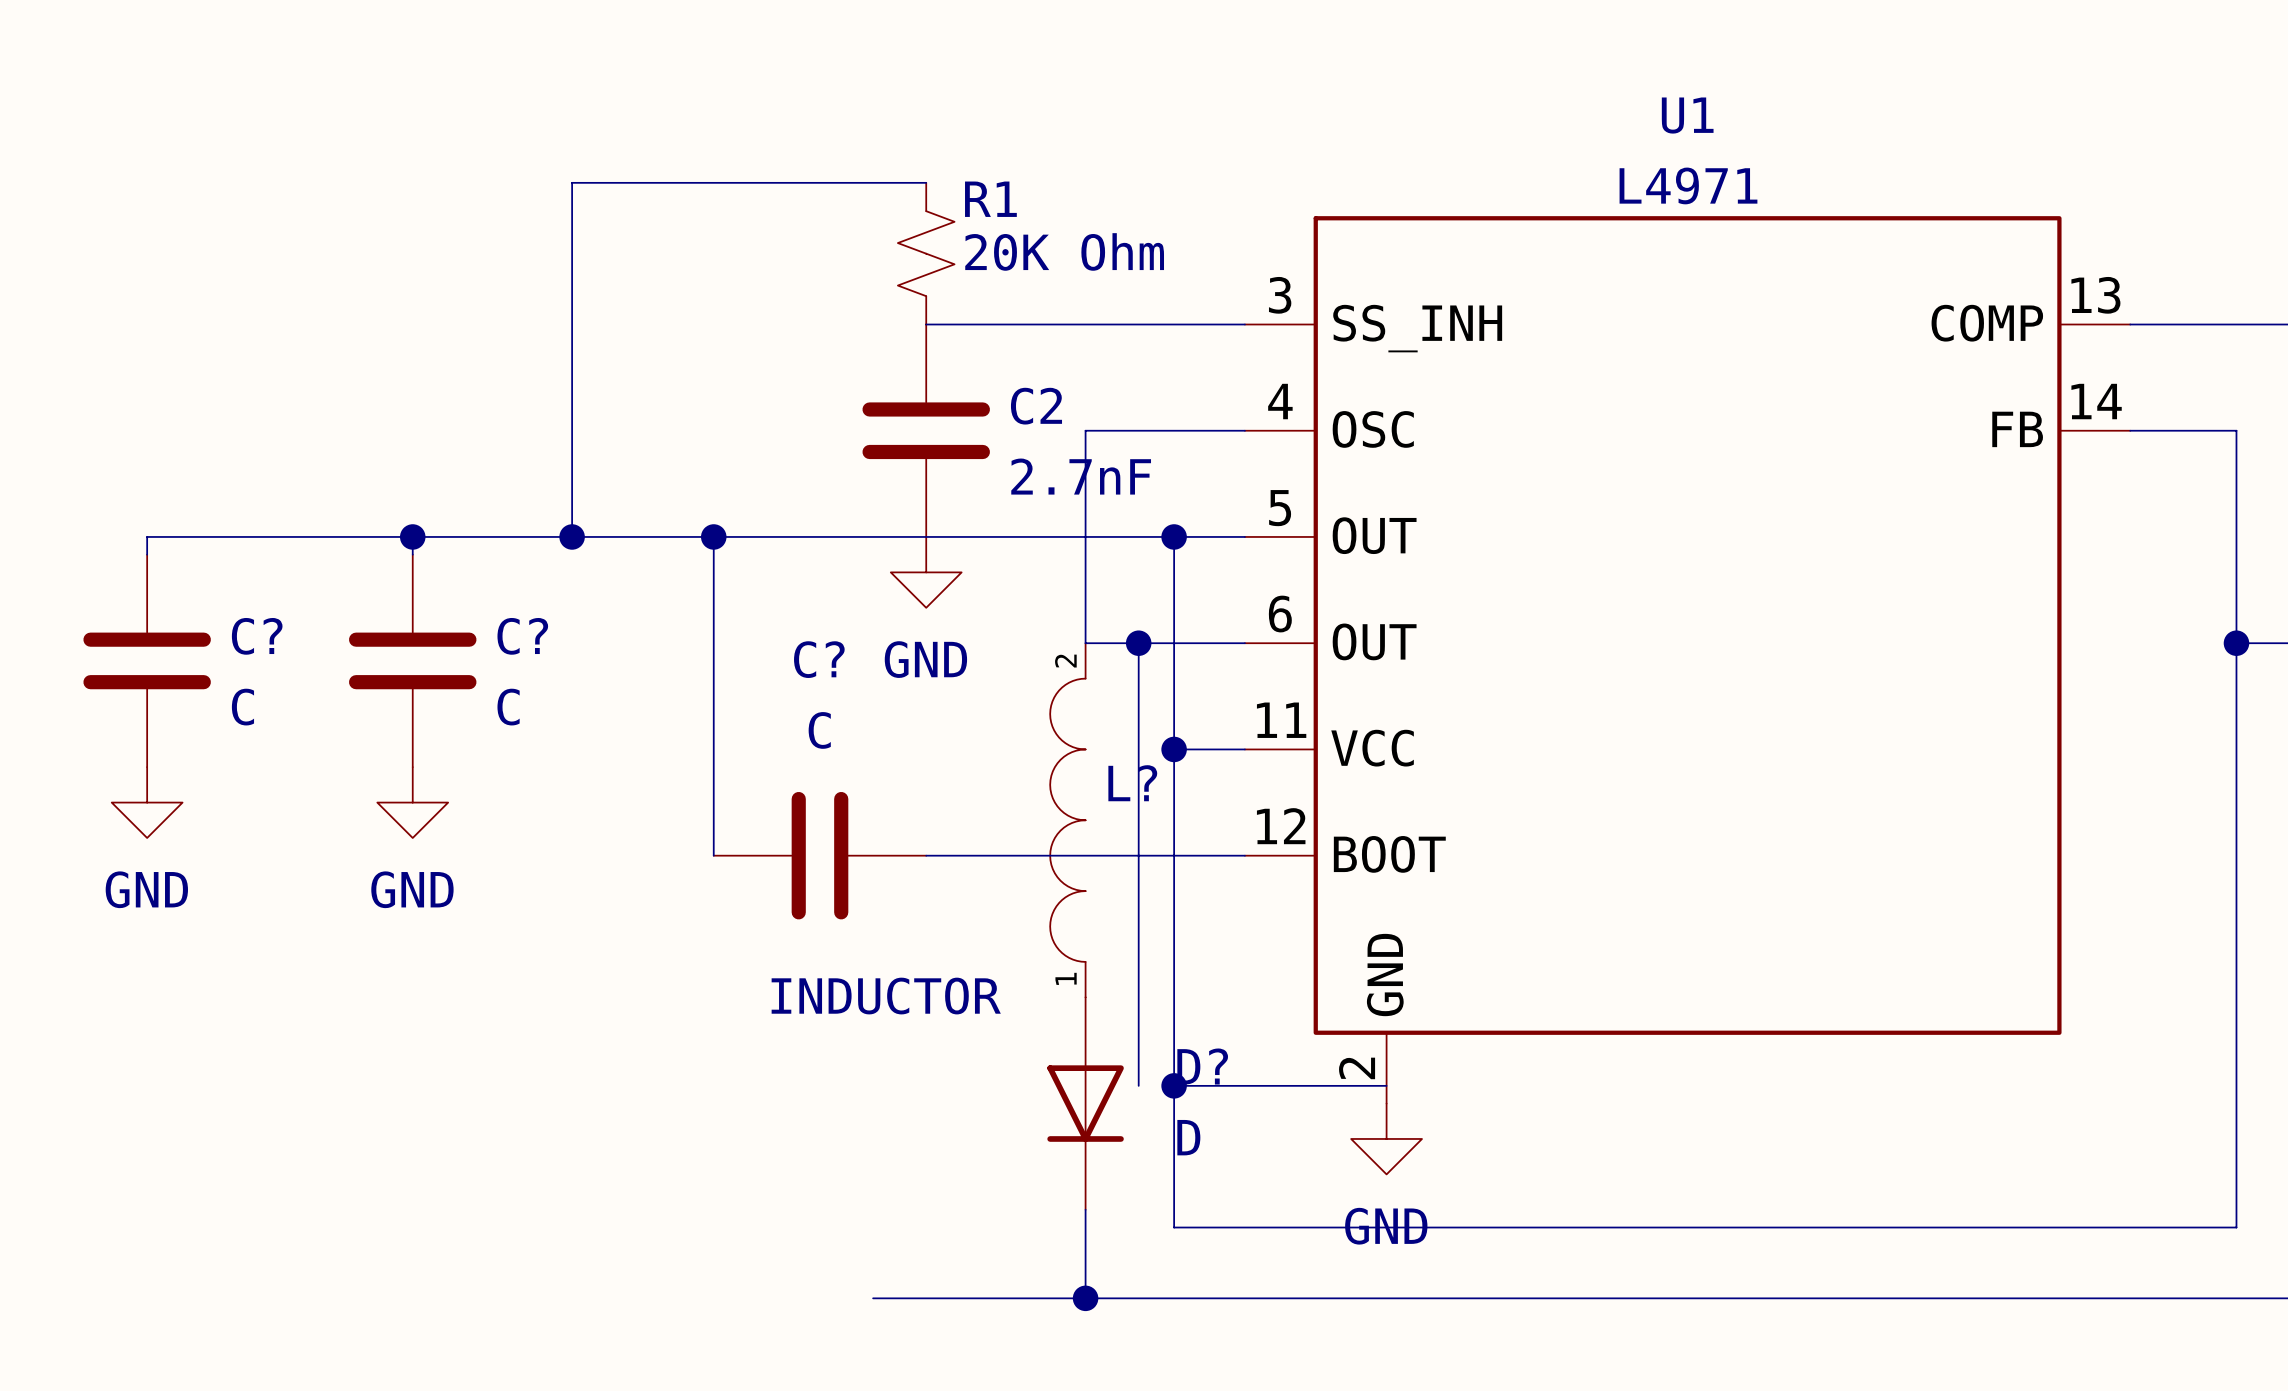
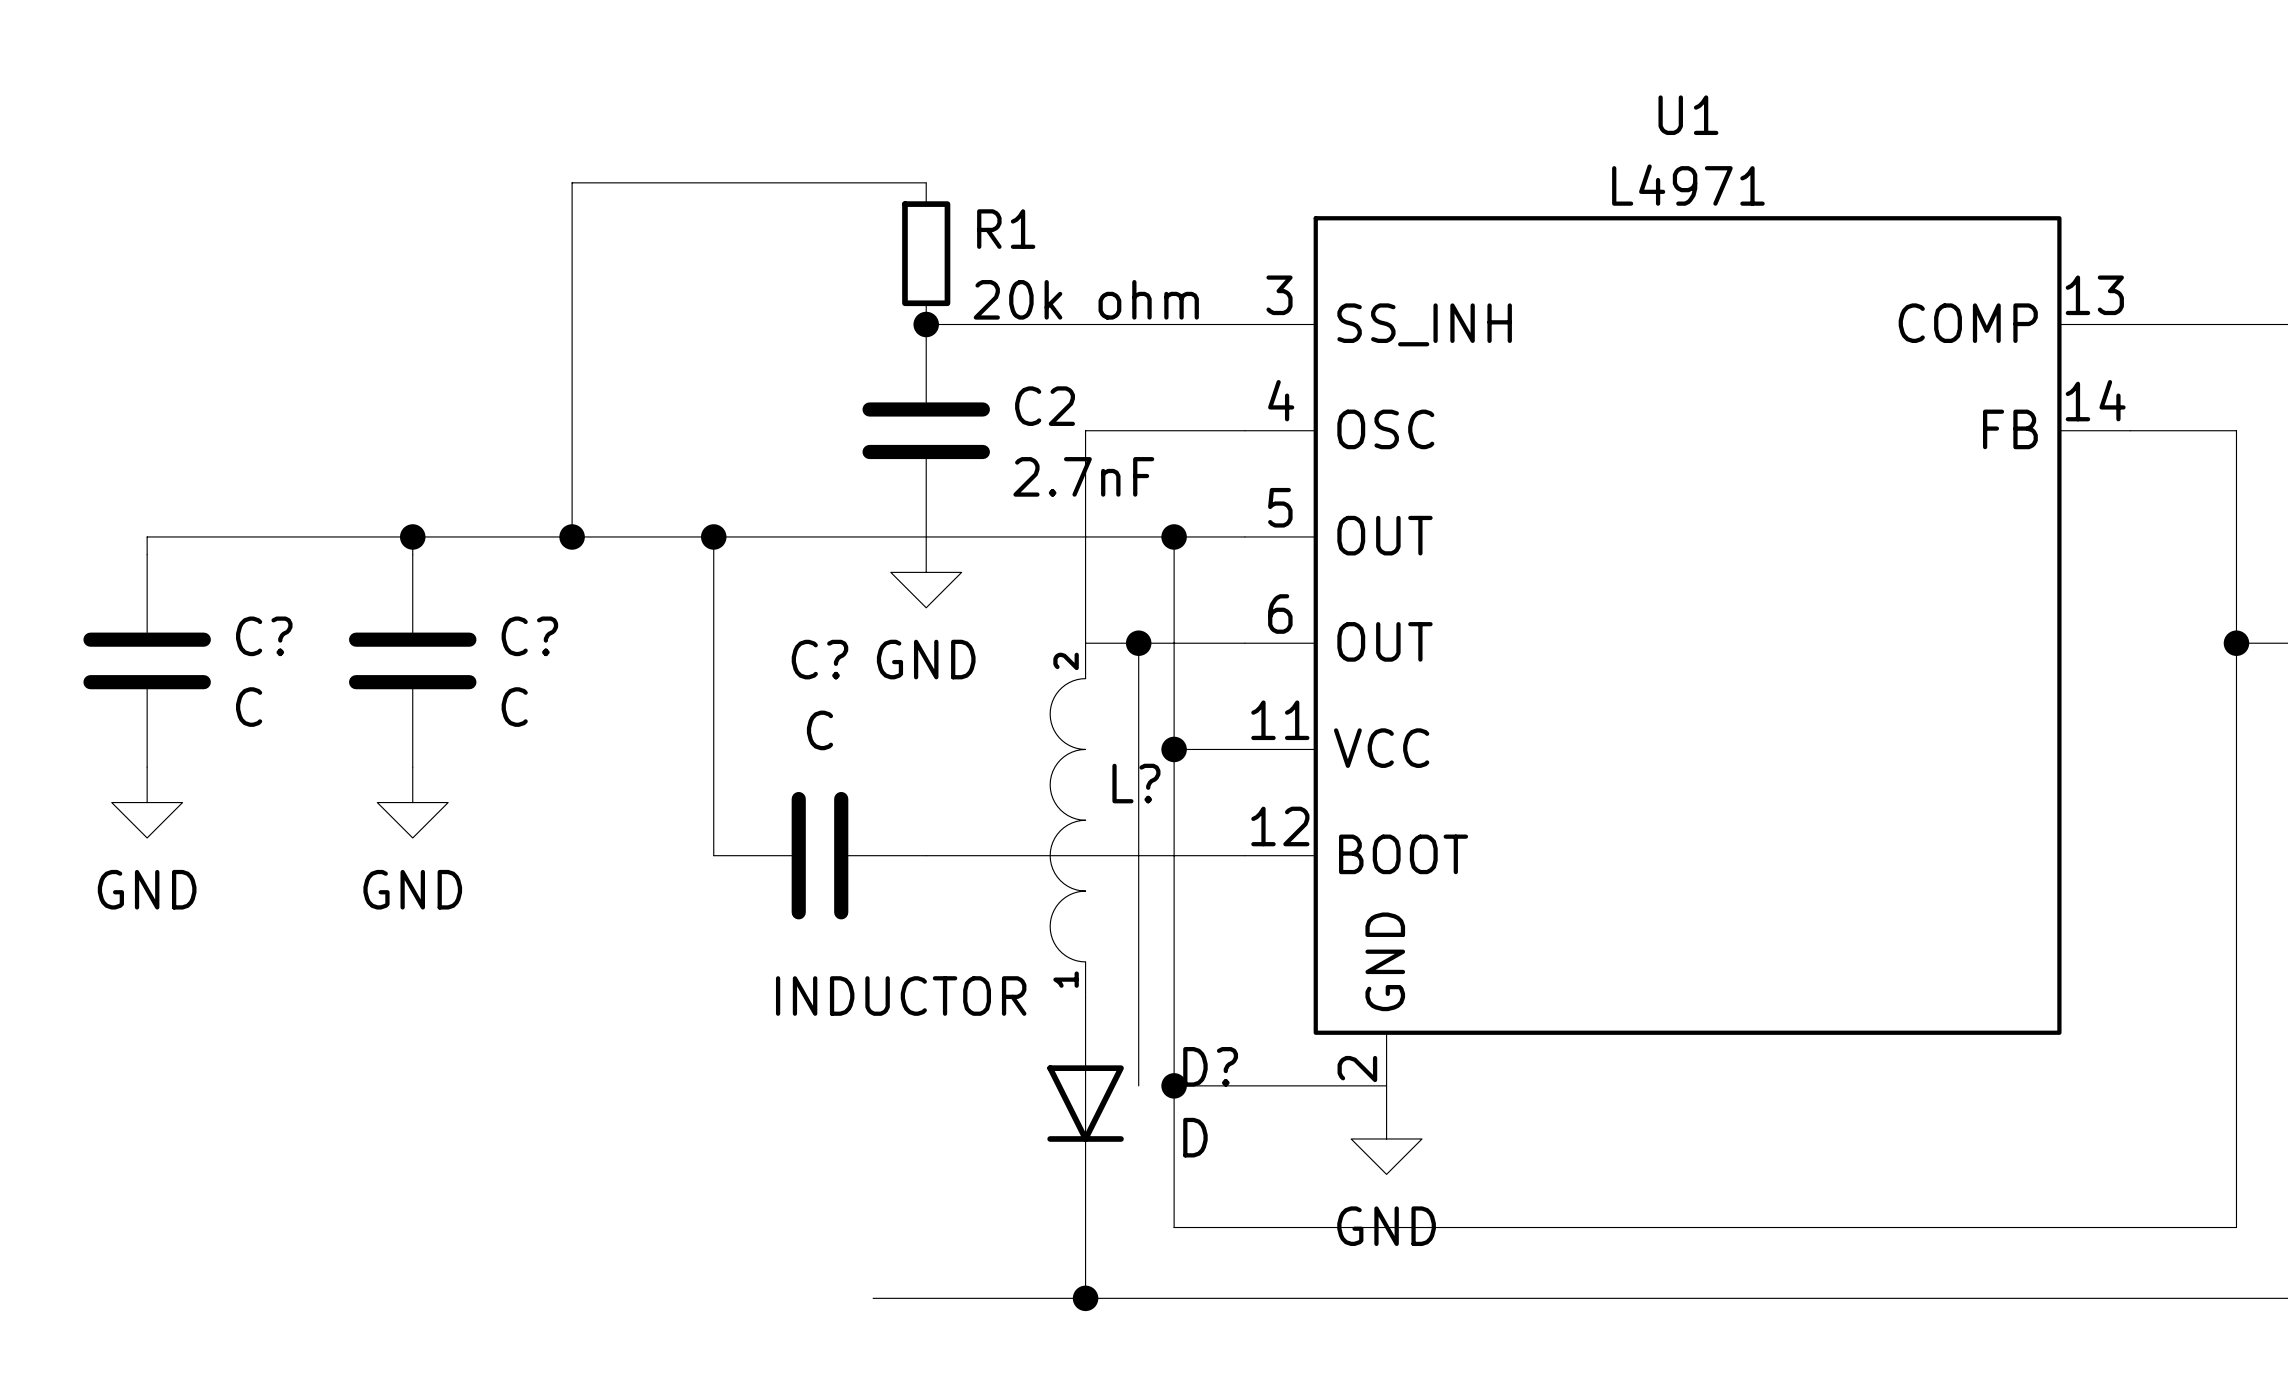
R1 symbol: [897, 182, 955, 325] -> [902, 182, 951, 325]
R1 name position: R1 (990, 199) -> R1 (1006, 229)
R1 value: 20K Ohm (1064, 251) -> 20k ohm (1086, 299)
junction: none -> (926, 324)

